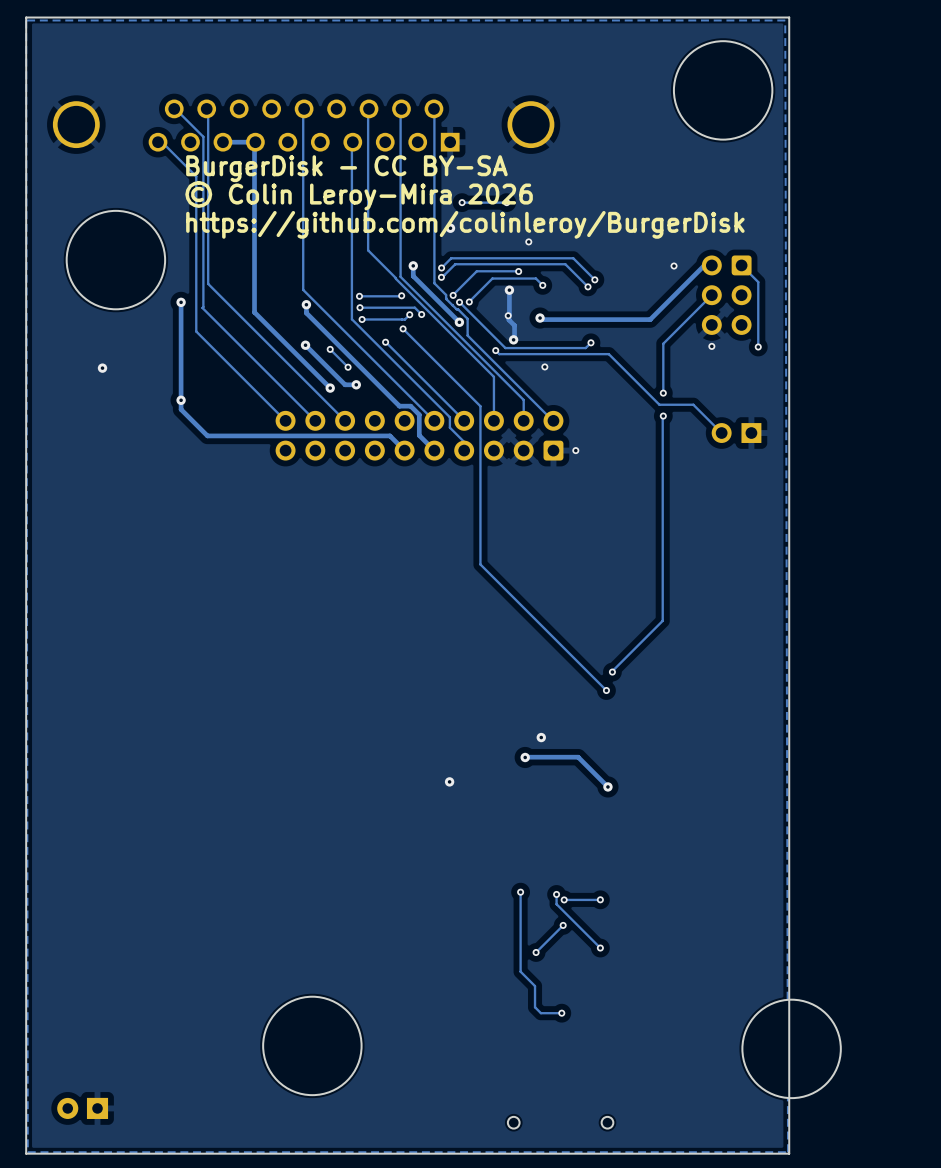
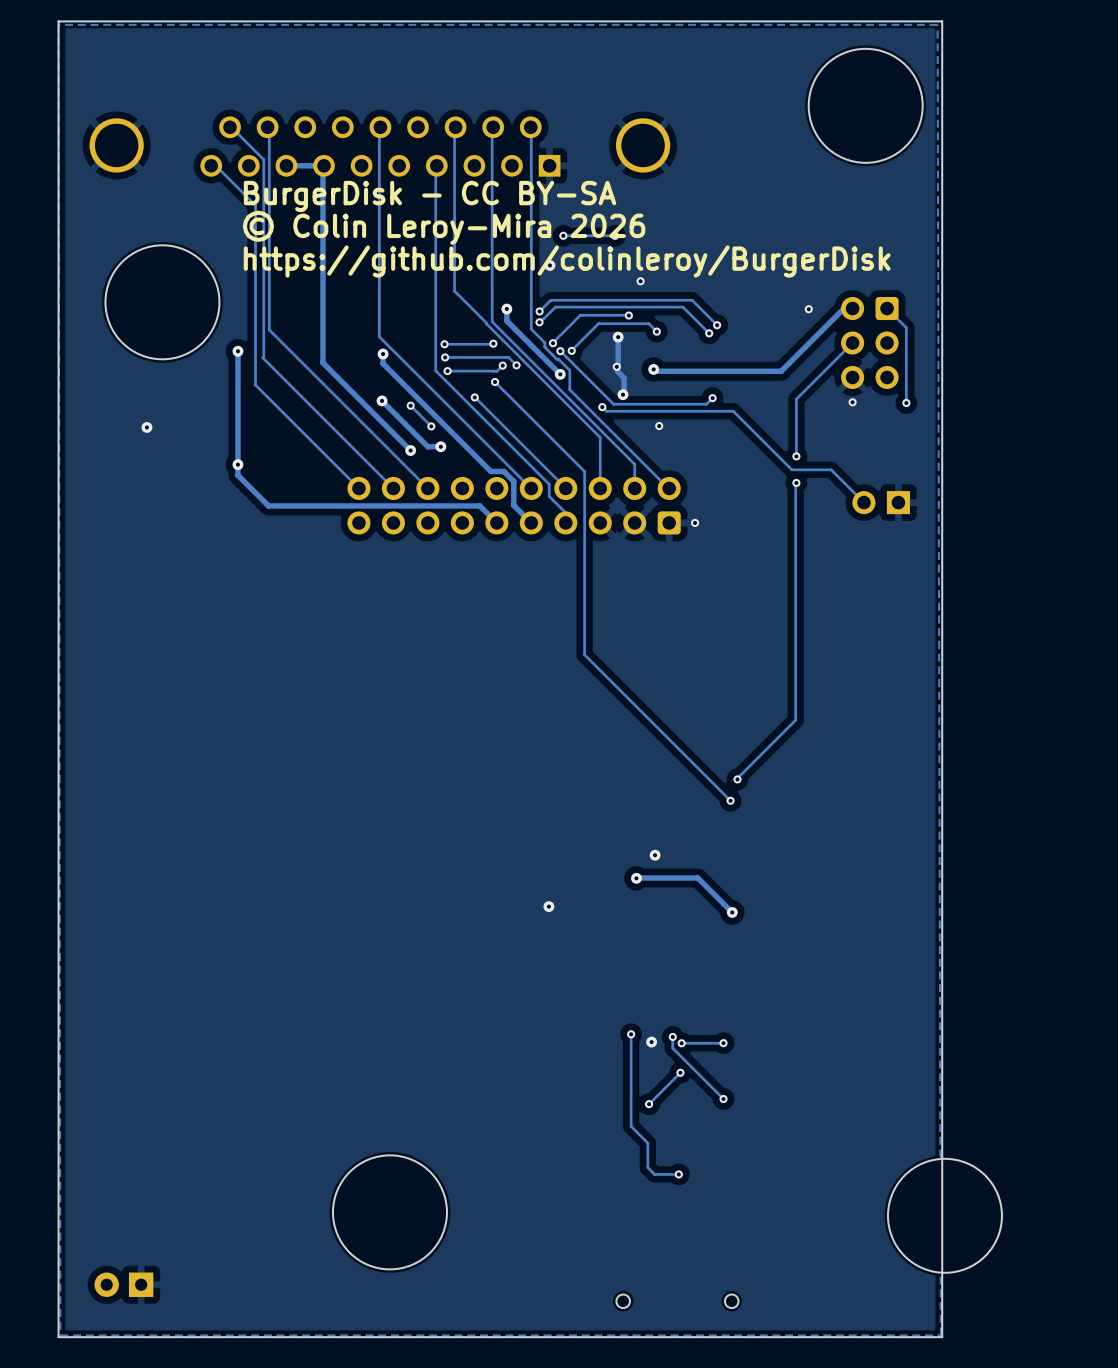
via: none -> (651, 1042)

